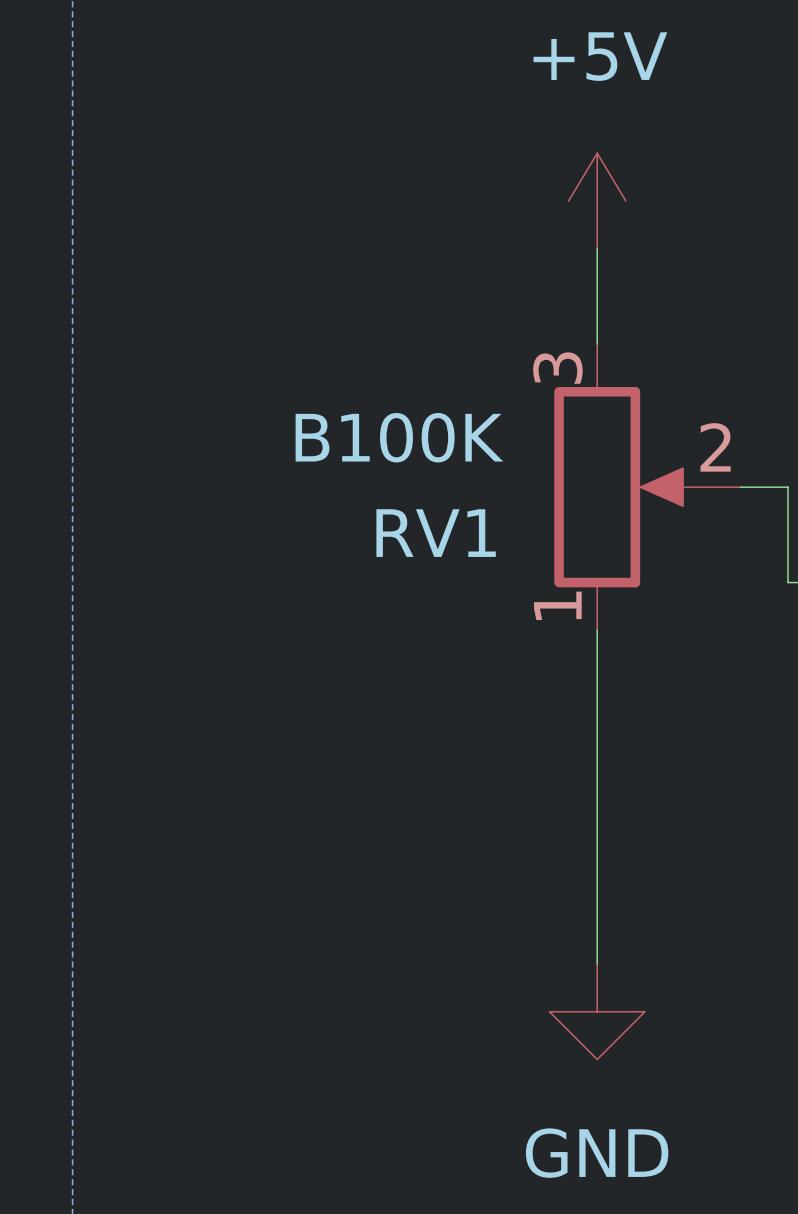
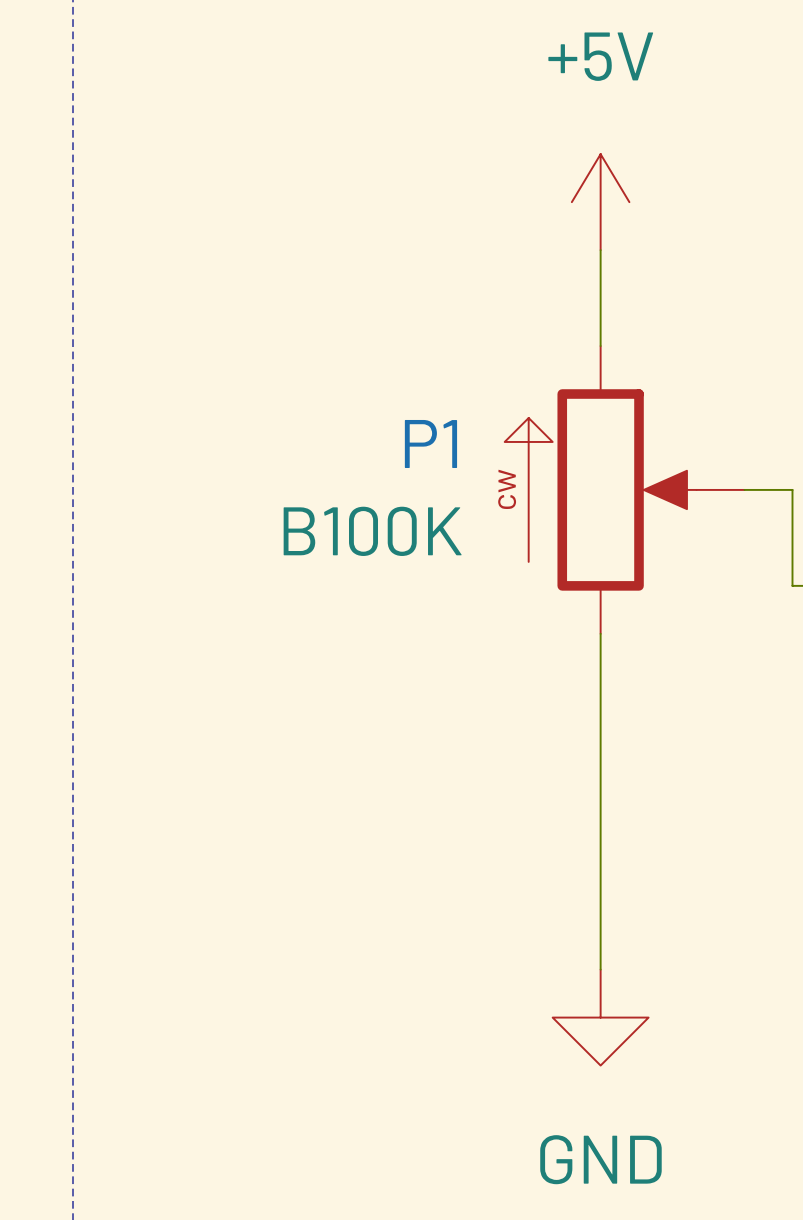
P1: none -> B100K (624, 489)
RV1: B100K (647, 487) -> none

